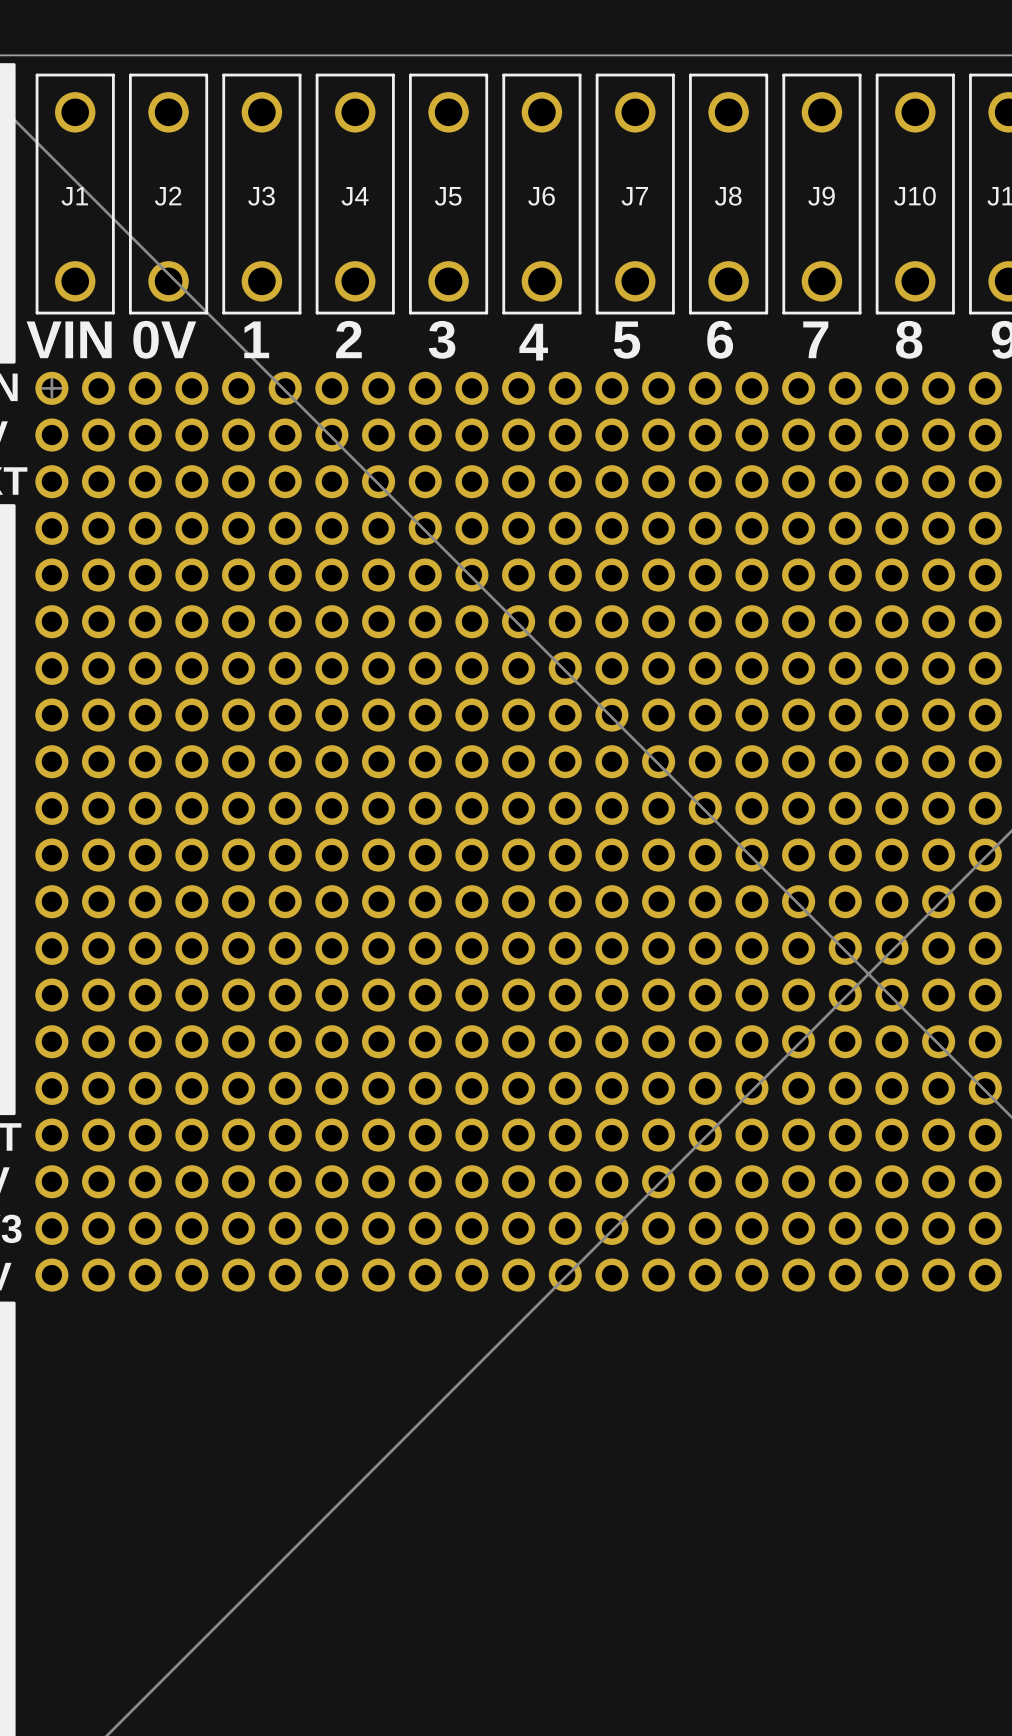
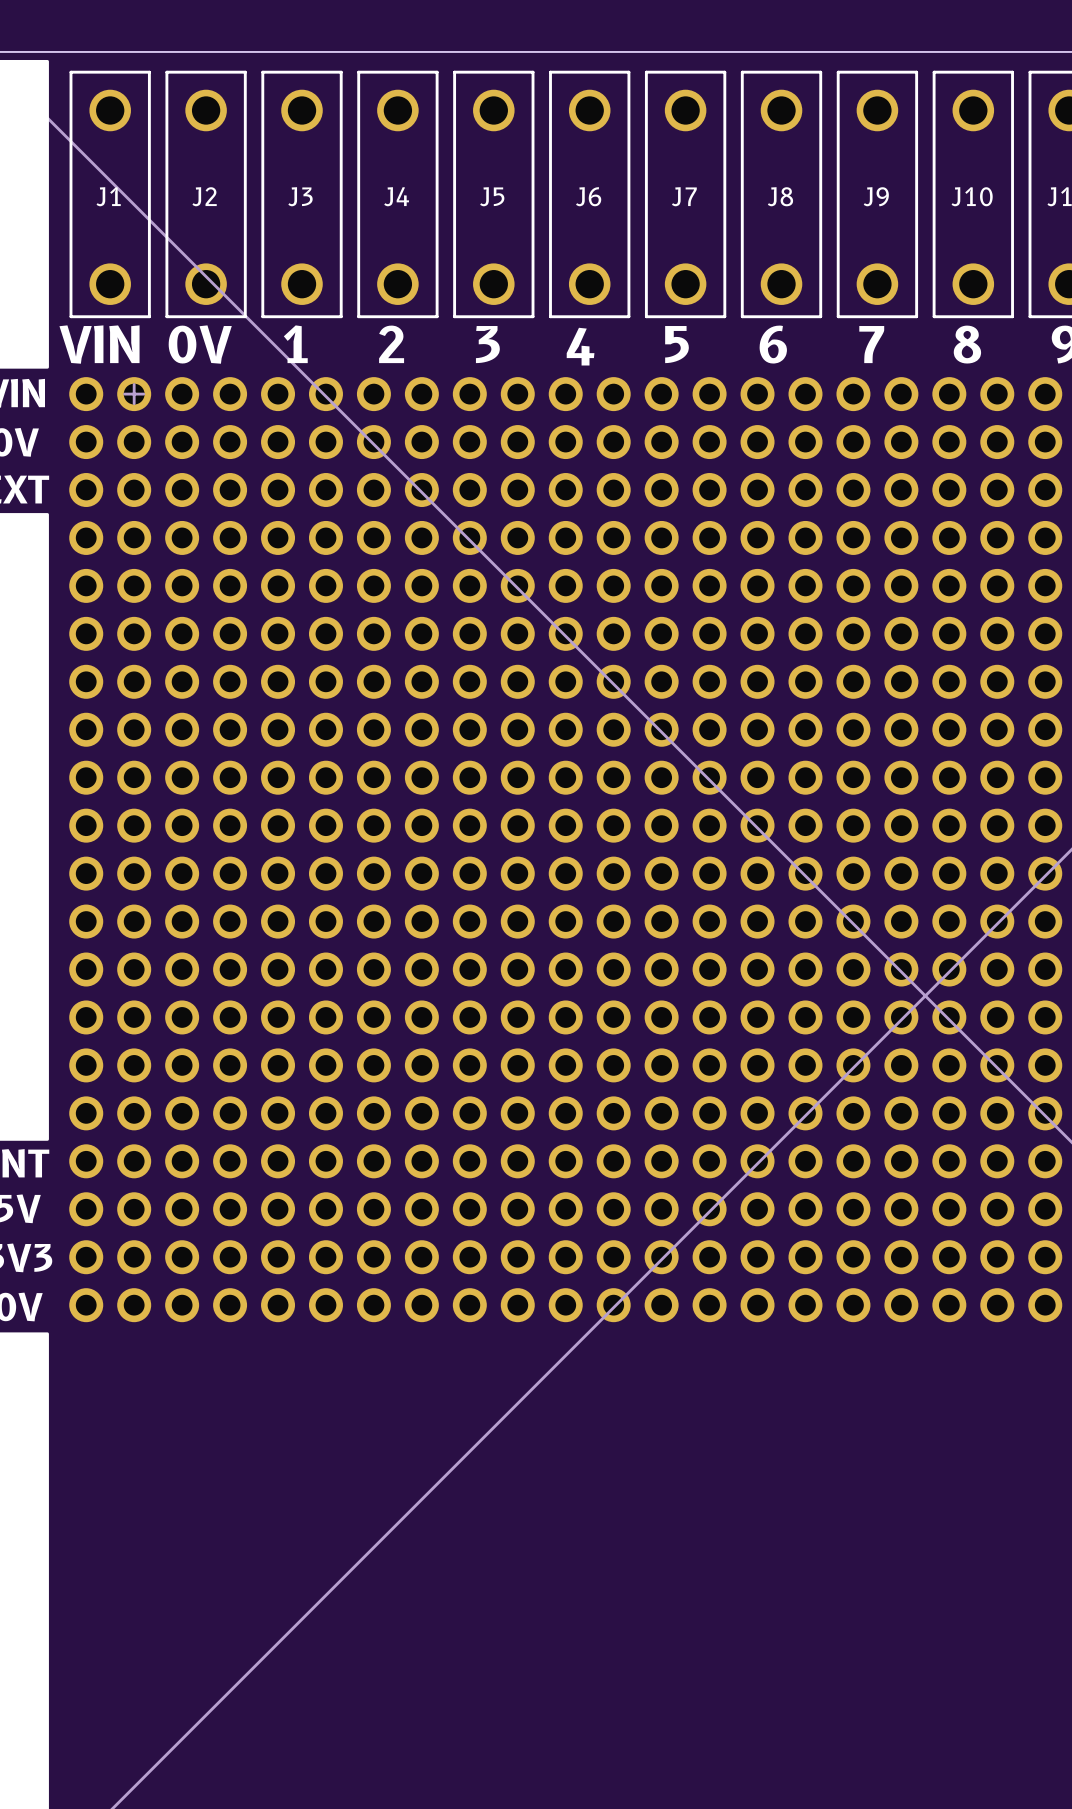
line: (51, 379) (51, 397) -> (134, 384) (134, 403)
line: (42, 388) (61, 388) -> (124, 394) (143, 394)

